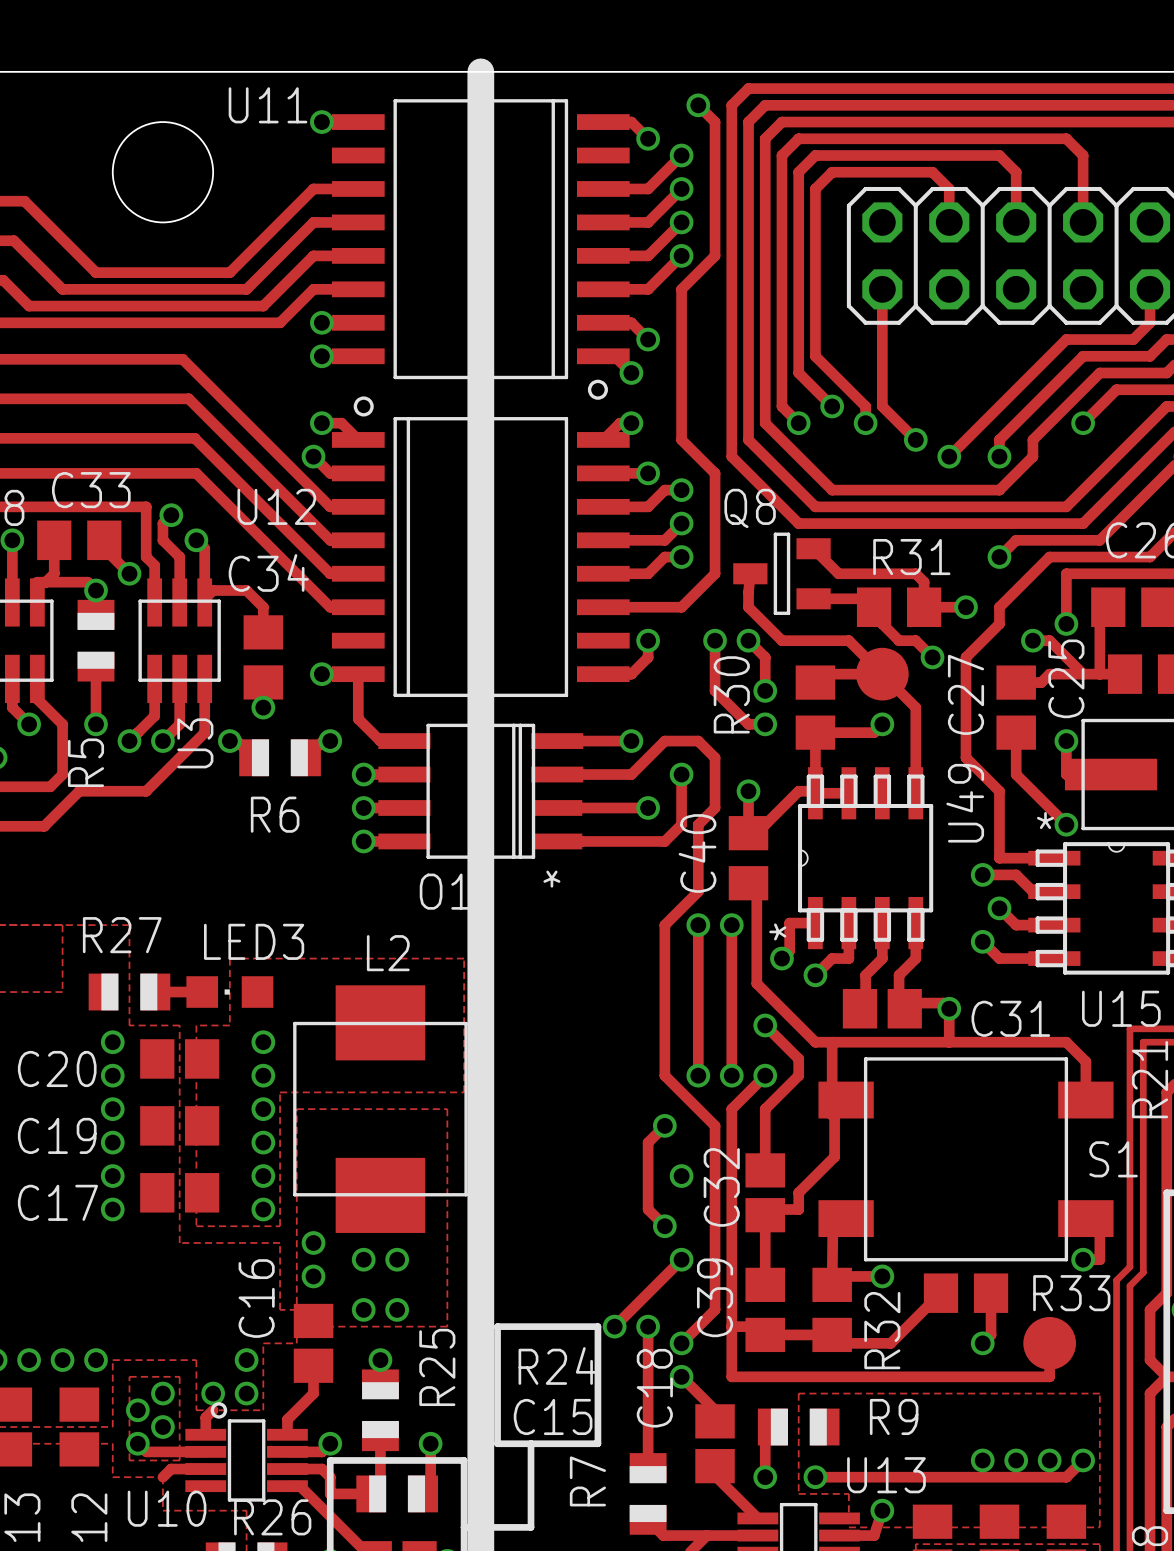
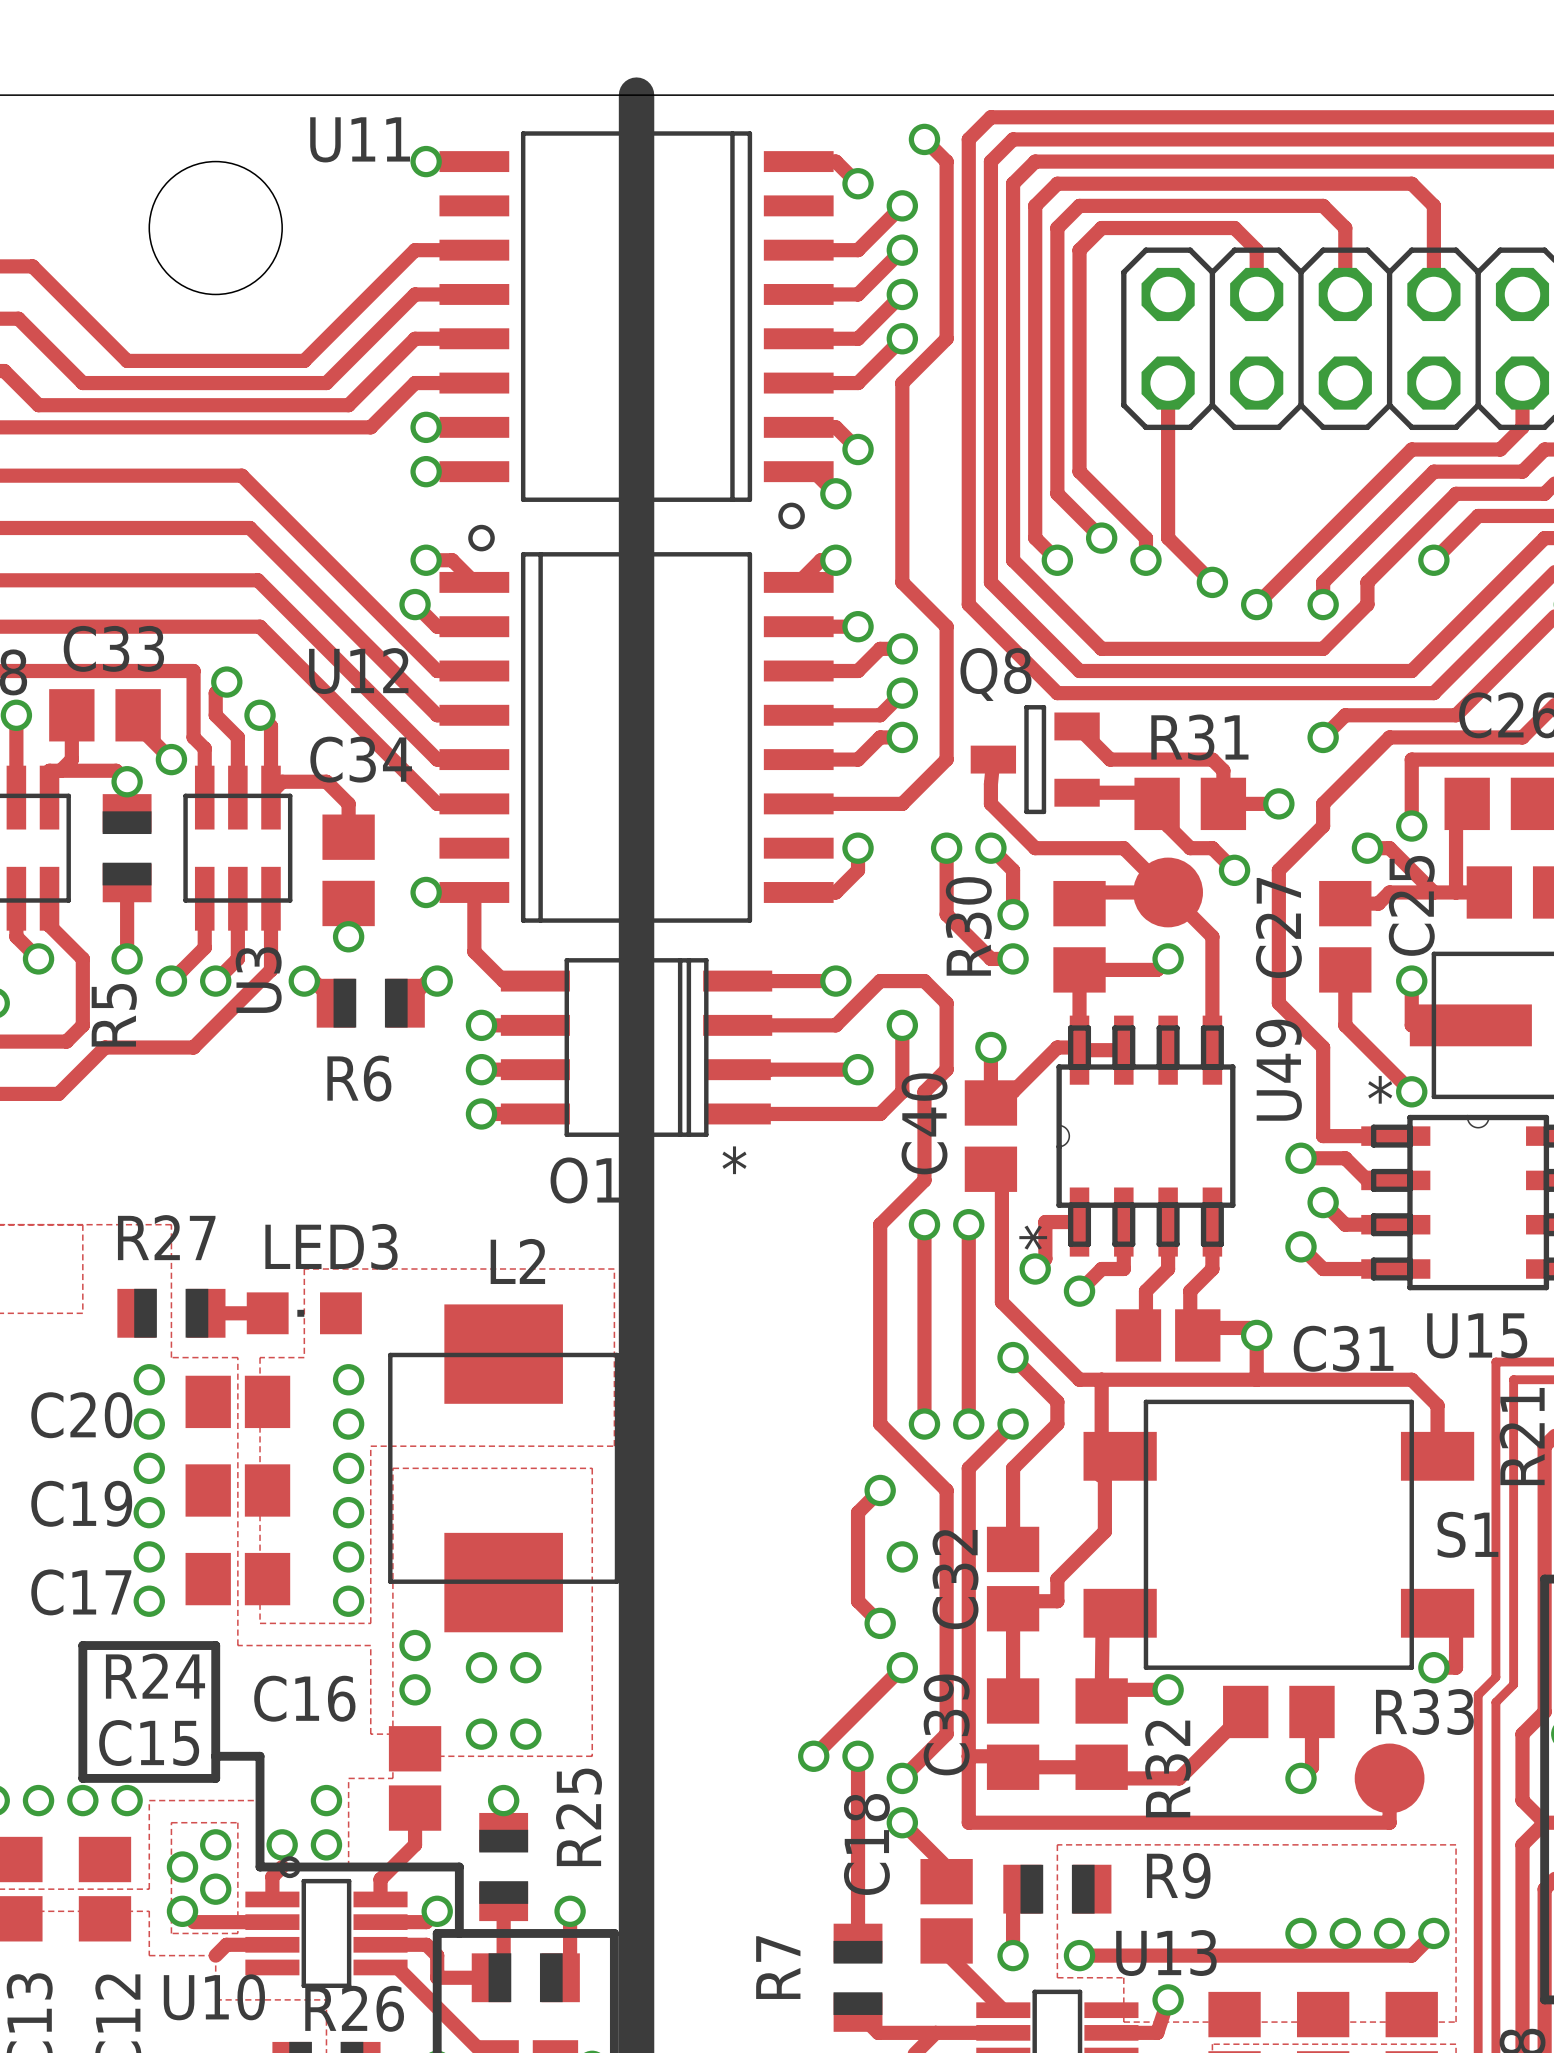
line: none -> (82, 1645) (82, 1778) (215, 1778) (215, 1645) (82, 1645)
C16 name rotation: 0° (256, 1298) -> 90° clockwise (304, 1698)
line: none -> (215, 1756) (260, 1756) (260, 1867) (459, 1867) (459, 1933)
line: (497, 1326) (597, 1326) (597, 1443) (497, 1443) (497, 1326) -> none
R24 name position: R24 (557, 1365) -> R24 (155, 1676)
C15 name position: C15 (553, 1416) -> C15 (149, 1743)
line: (531, 1443) (531, 1527) (464, 1527) -> none

